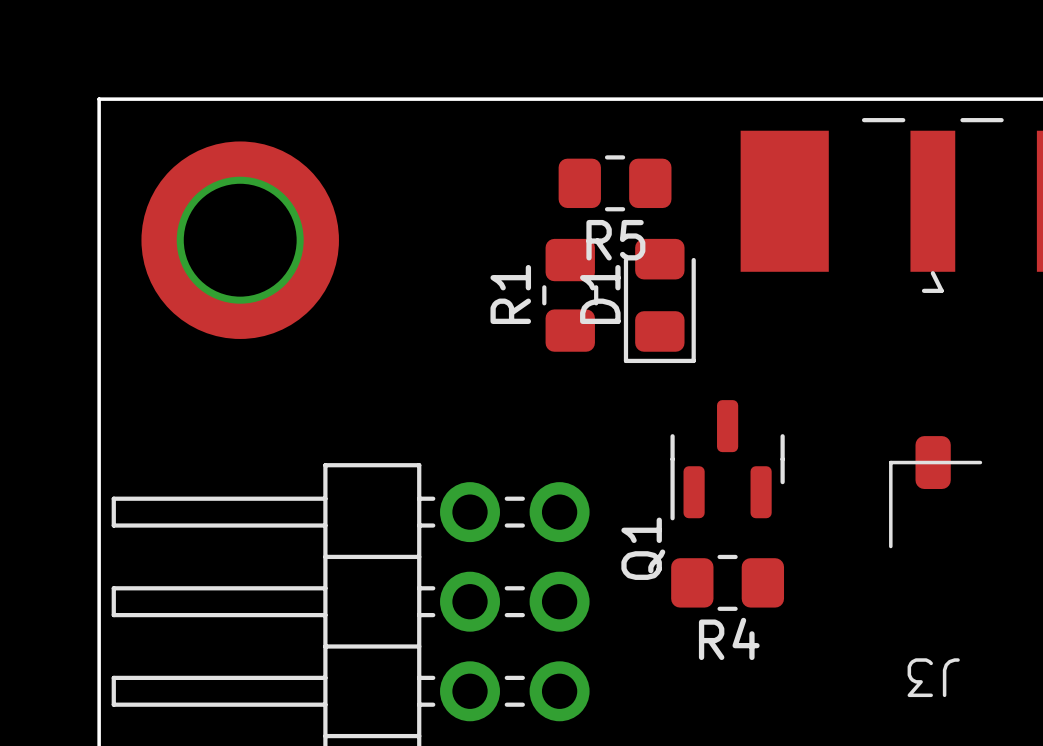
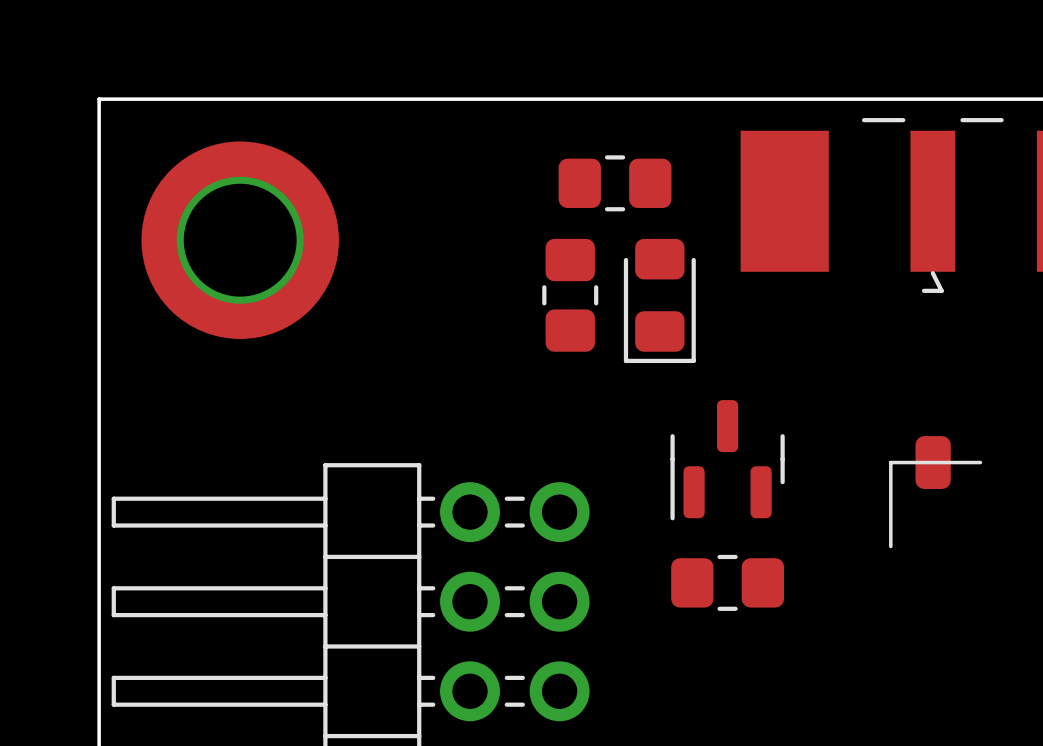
R5 name: R5 (615, 240) -> none
R1 name: R1 (510, 294) -> none
D1 name: D1 (600, 294) -> none
Q1 name: Q1 (643, 548) -> none
R4 name: R4 (729, 638) -> none
J3 name: J3 (933, 677) -> none

